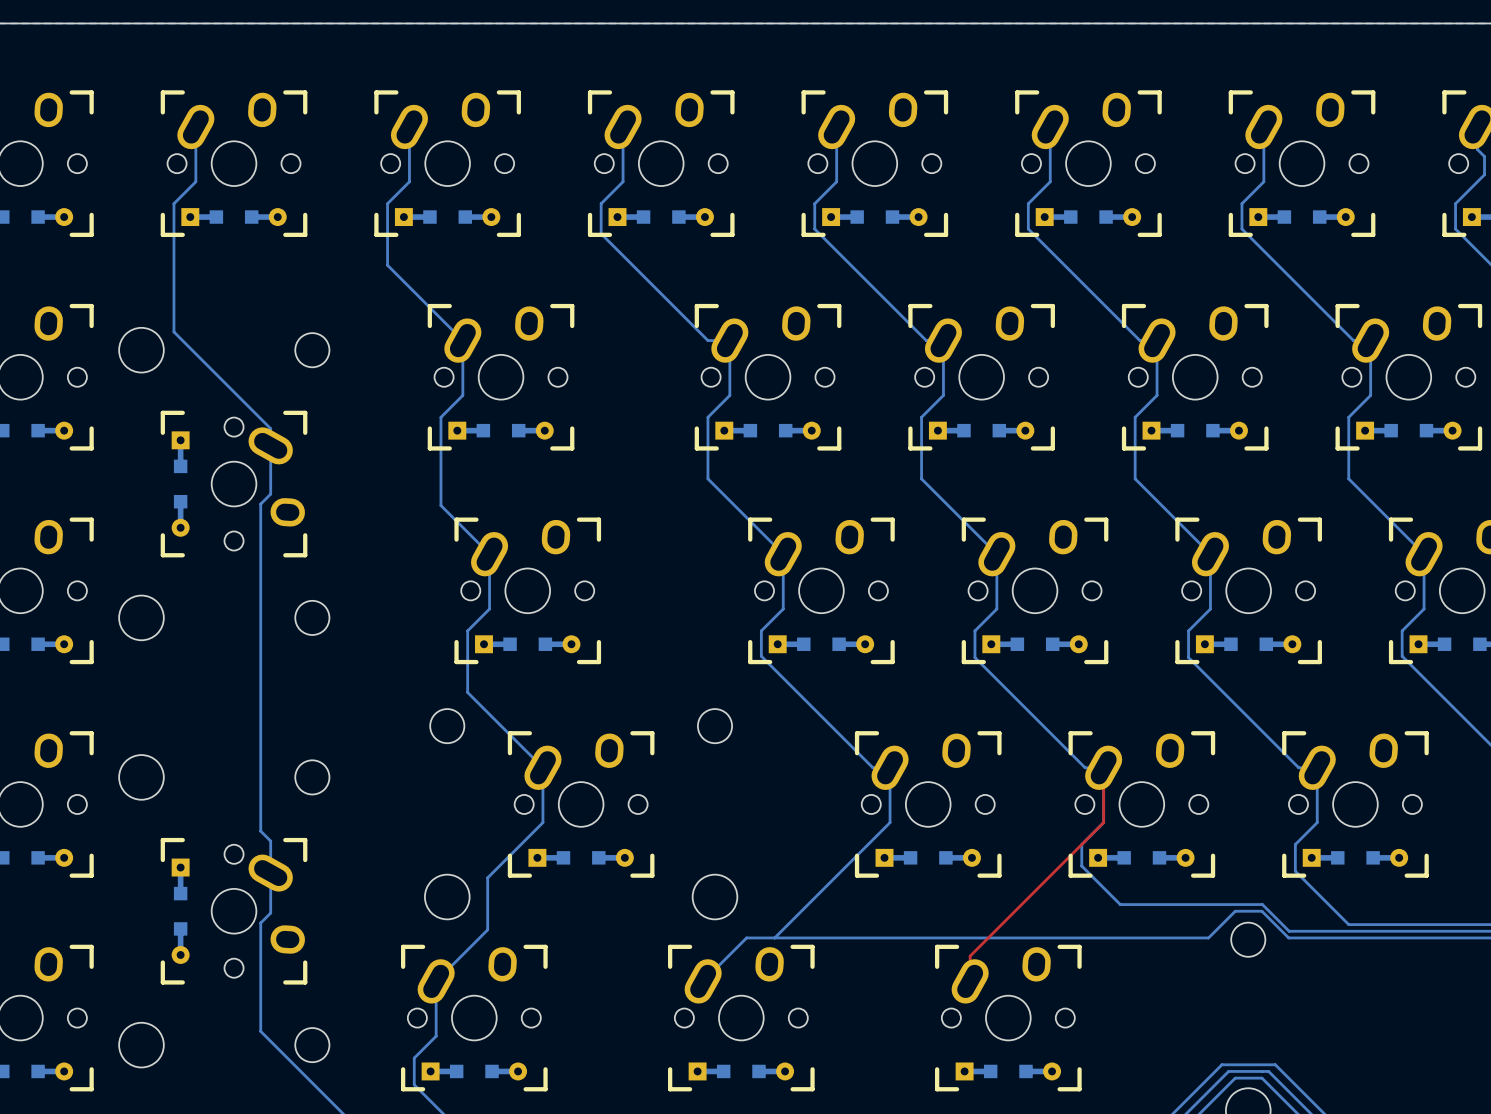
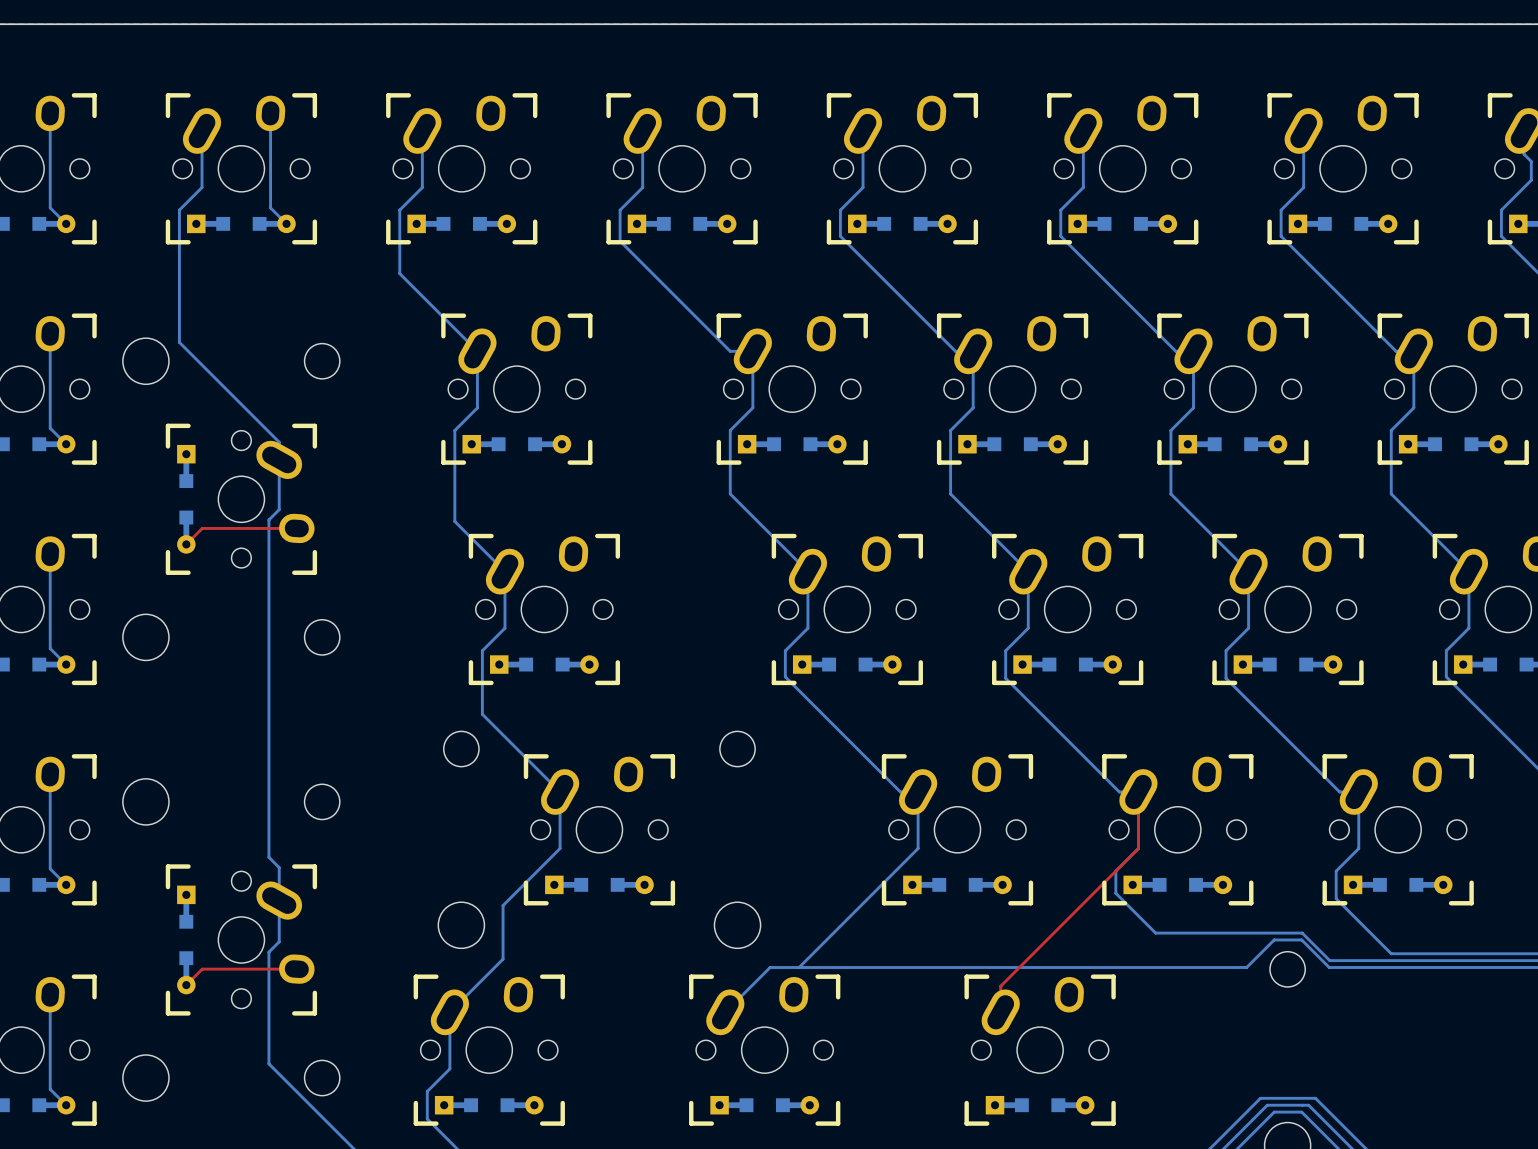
bottom track: none -> (50, 113) (50, 207) (66, 223)
bottom track: none -> (270, 113) (270, 207) (286, 223)
bottom track: none -> (50, 333) (50, 428) (66, 444)
top track: none -> (296, 528) (202, 528) (186, 544)
bottom track: none -> (50, 554) (50, 648) (66, 664)
bottom track: none -> (50, 774) (50, 868) (66, 884)
top track: none -> (296, 969) (202, 969) (186, 985)
bottom track: none -> (50, 994) (50, 1089) (66, 1105)

